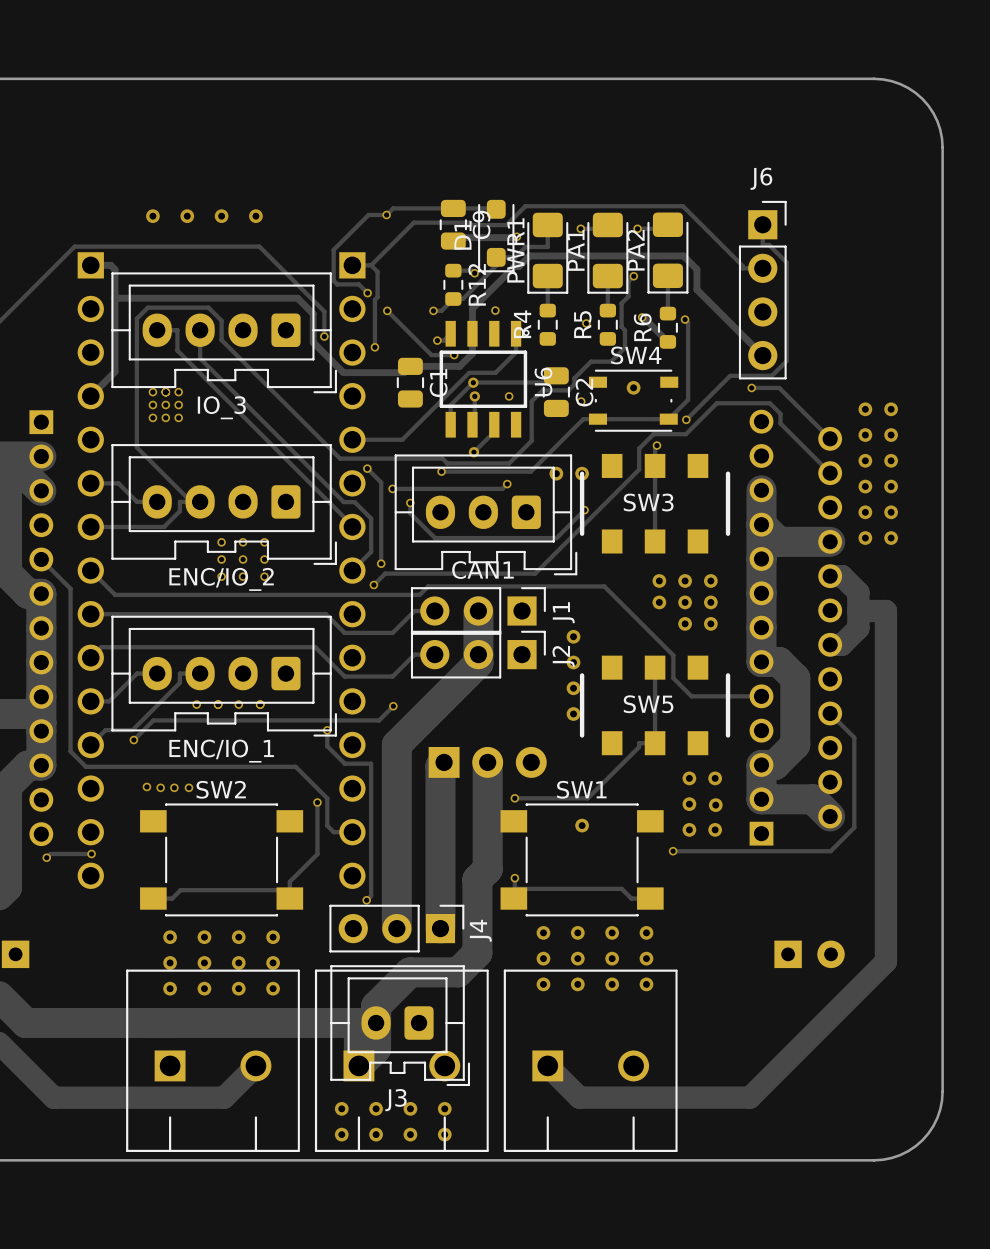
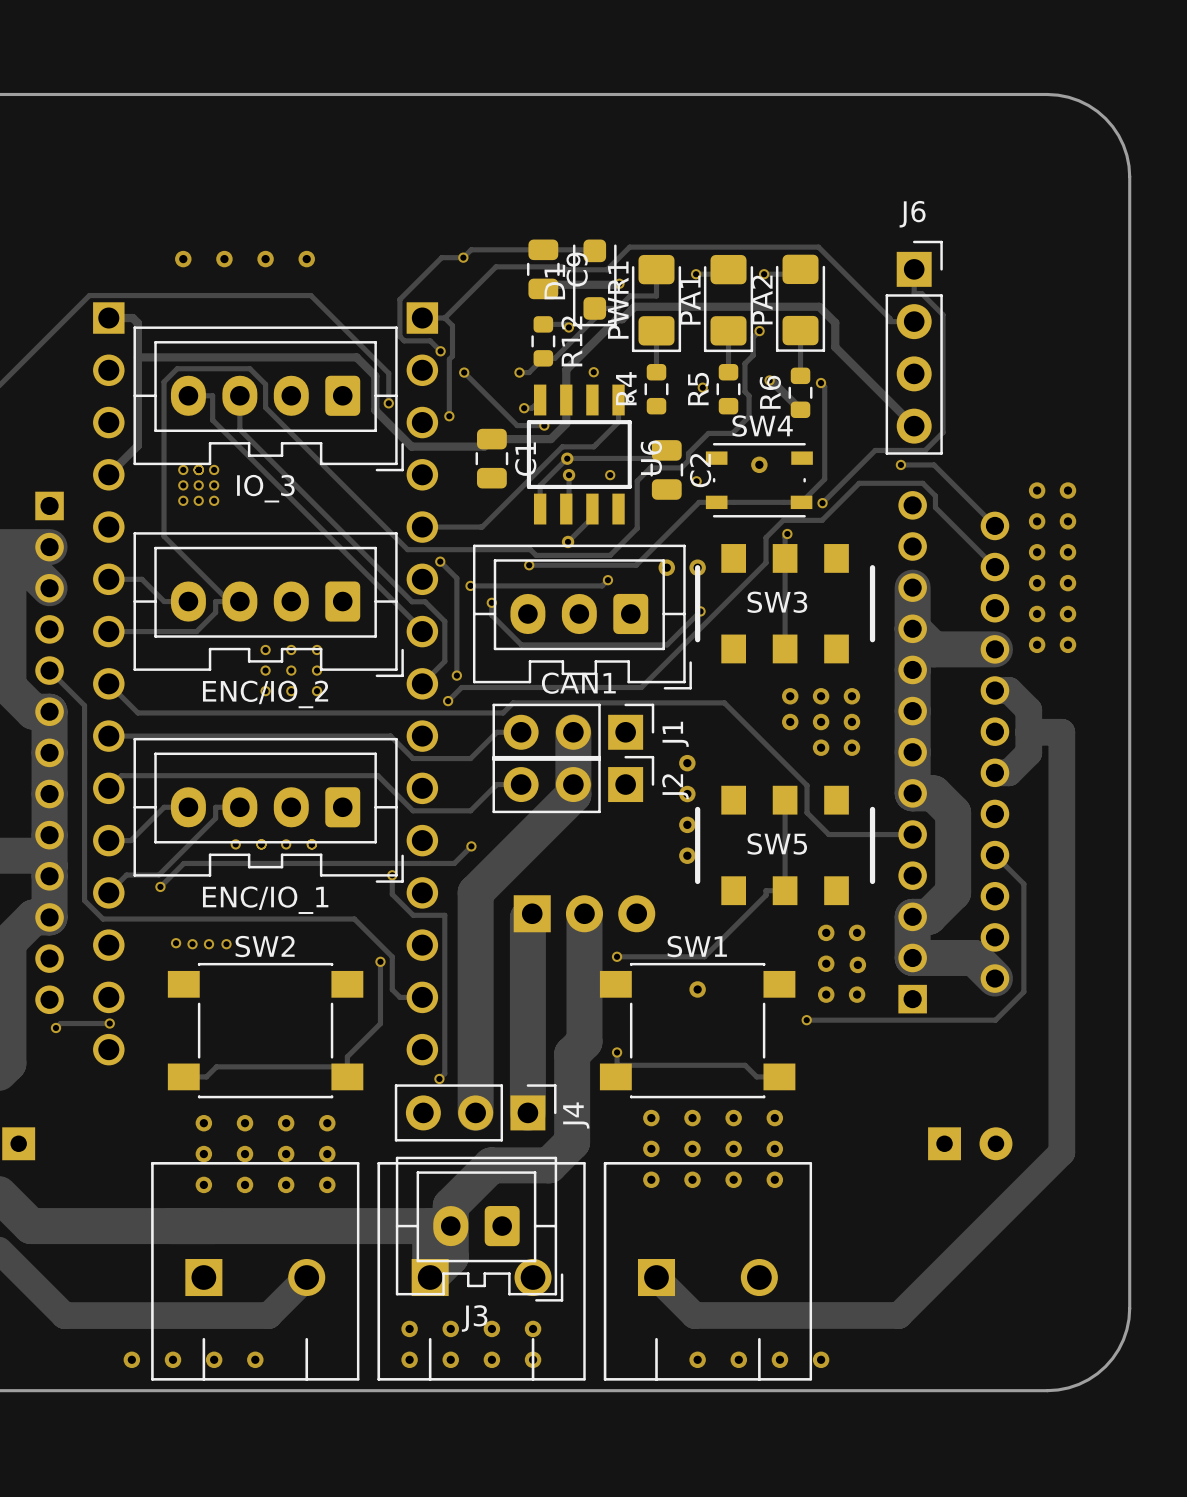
via: none -> (131, 1359)
via: none -> (173, 1359)
via: none -> (214, 1359)
via: none -> (255, 1359)
via: none -> (697, 1359)
via: none -> (738, 1359)
via: none -> (779, 1359)
via: none -> (821, 1359)

